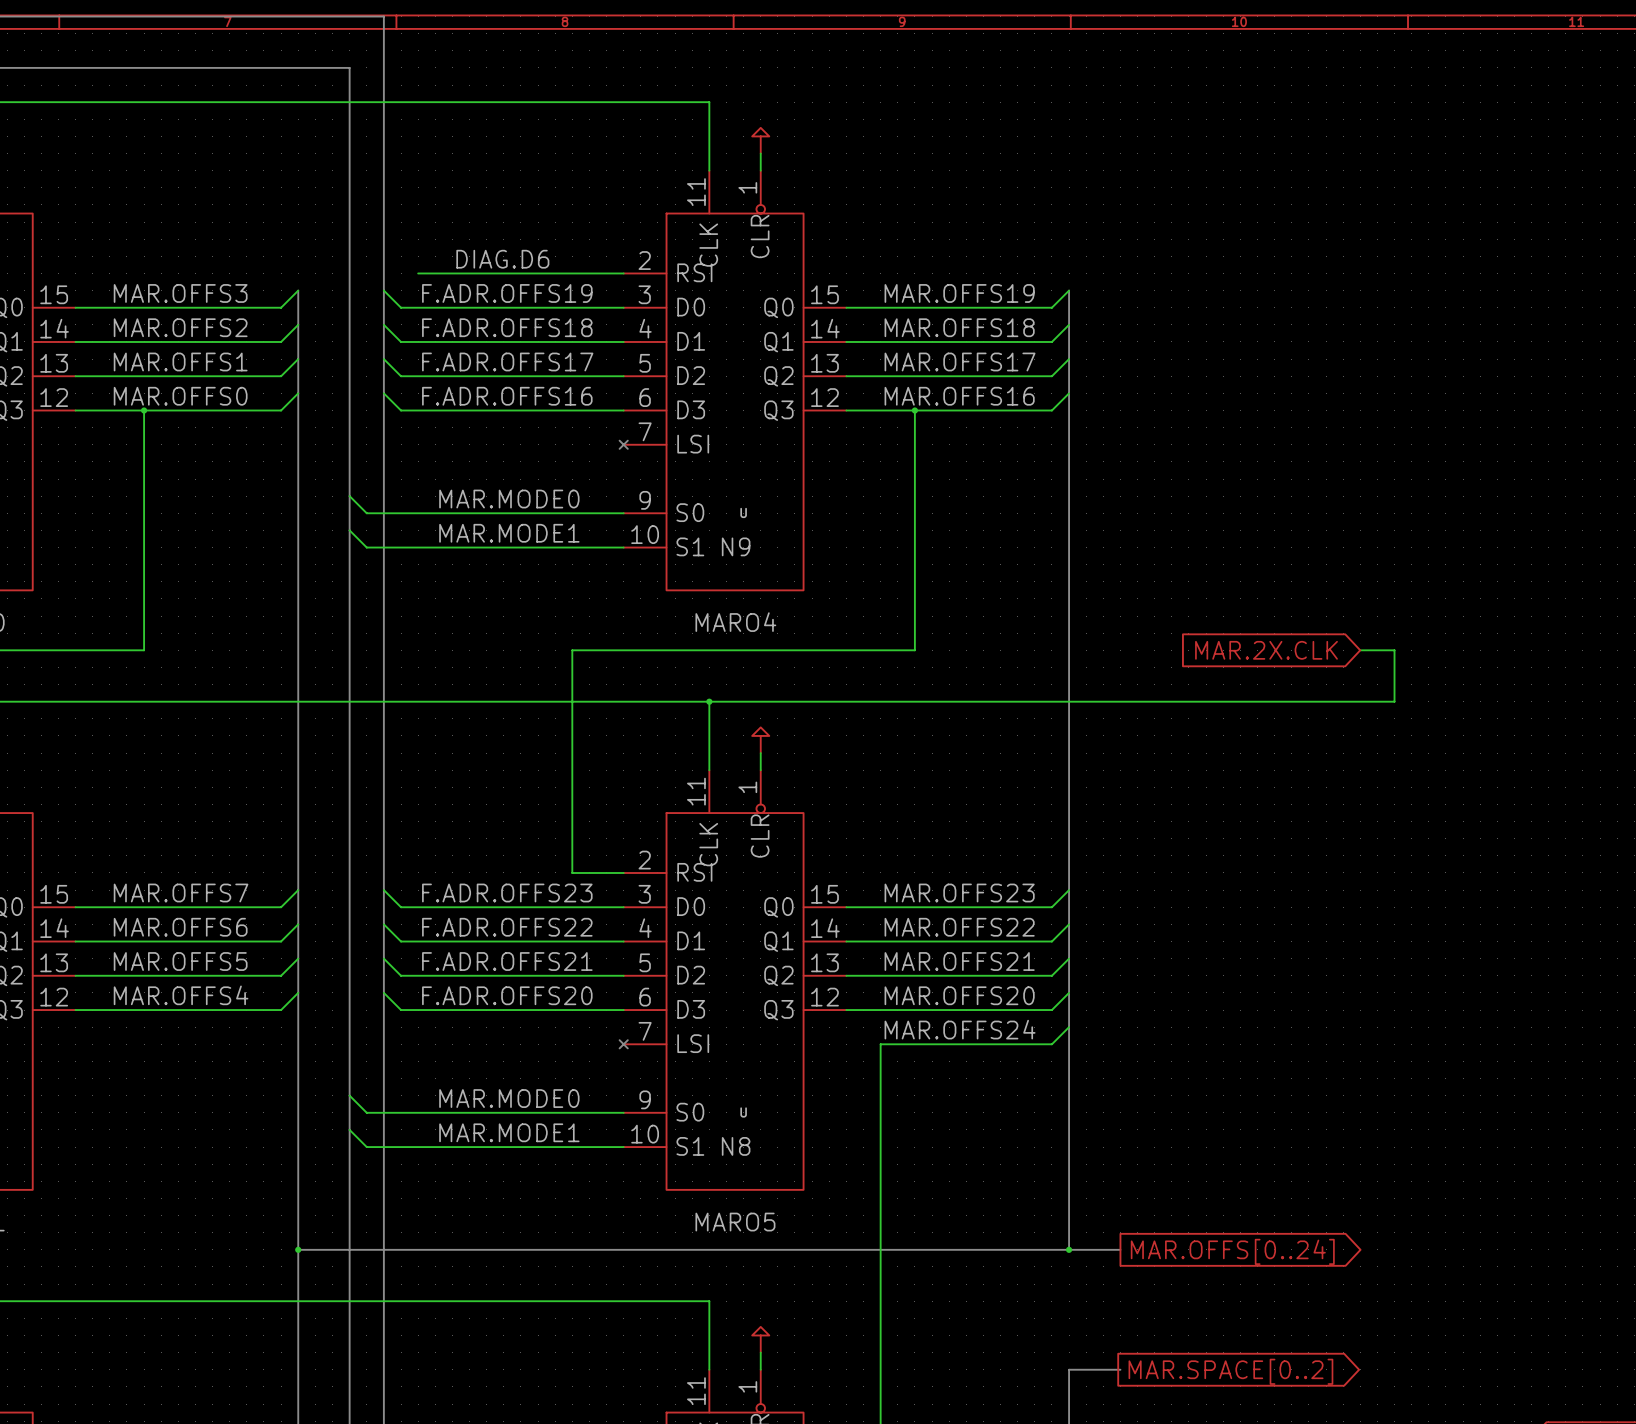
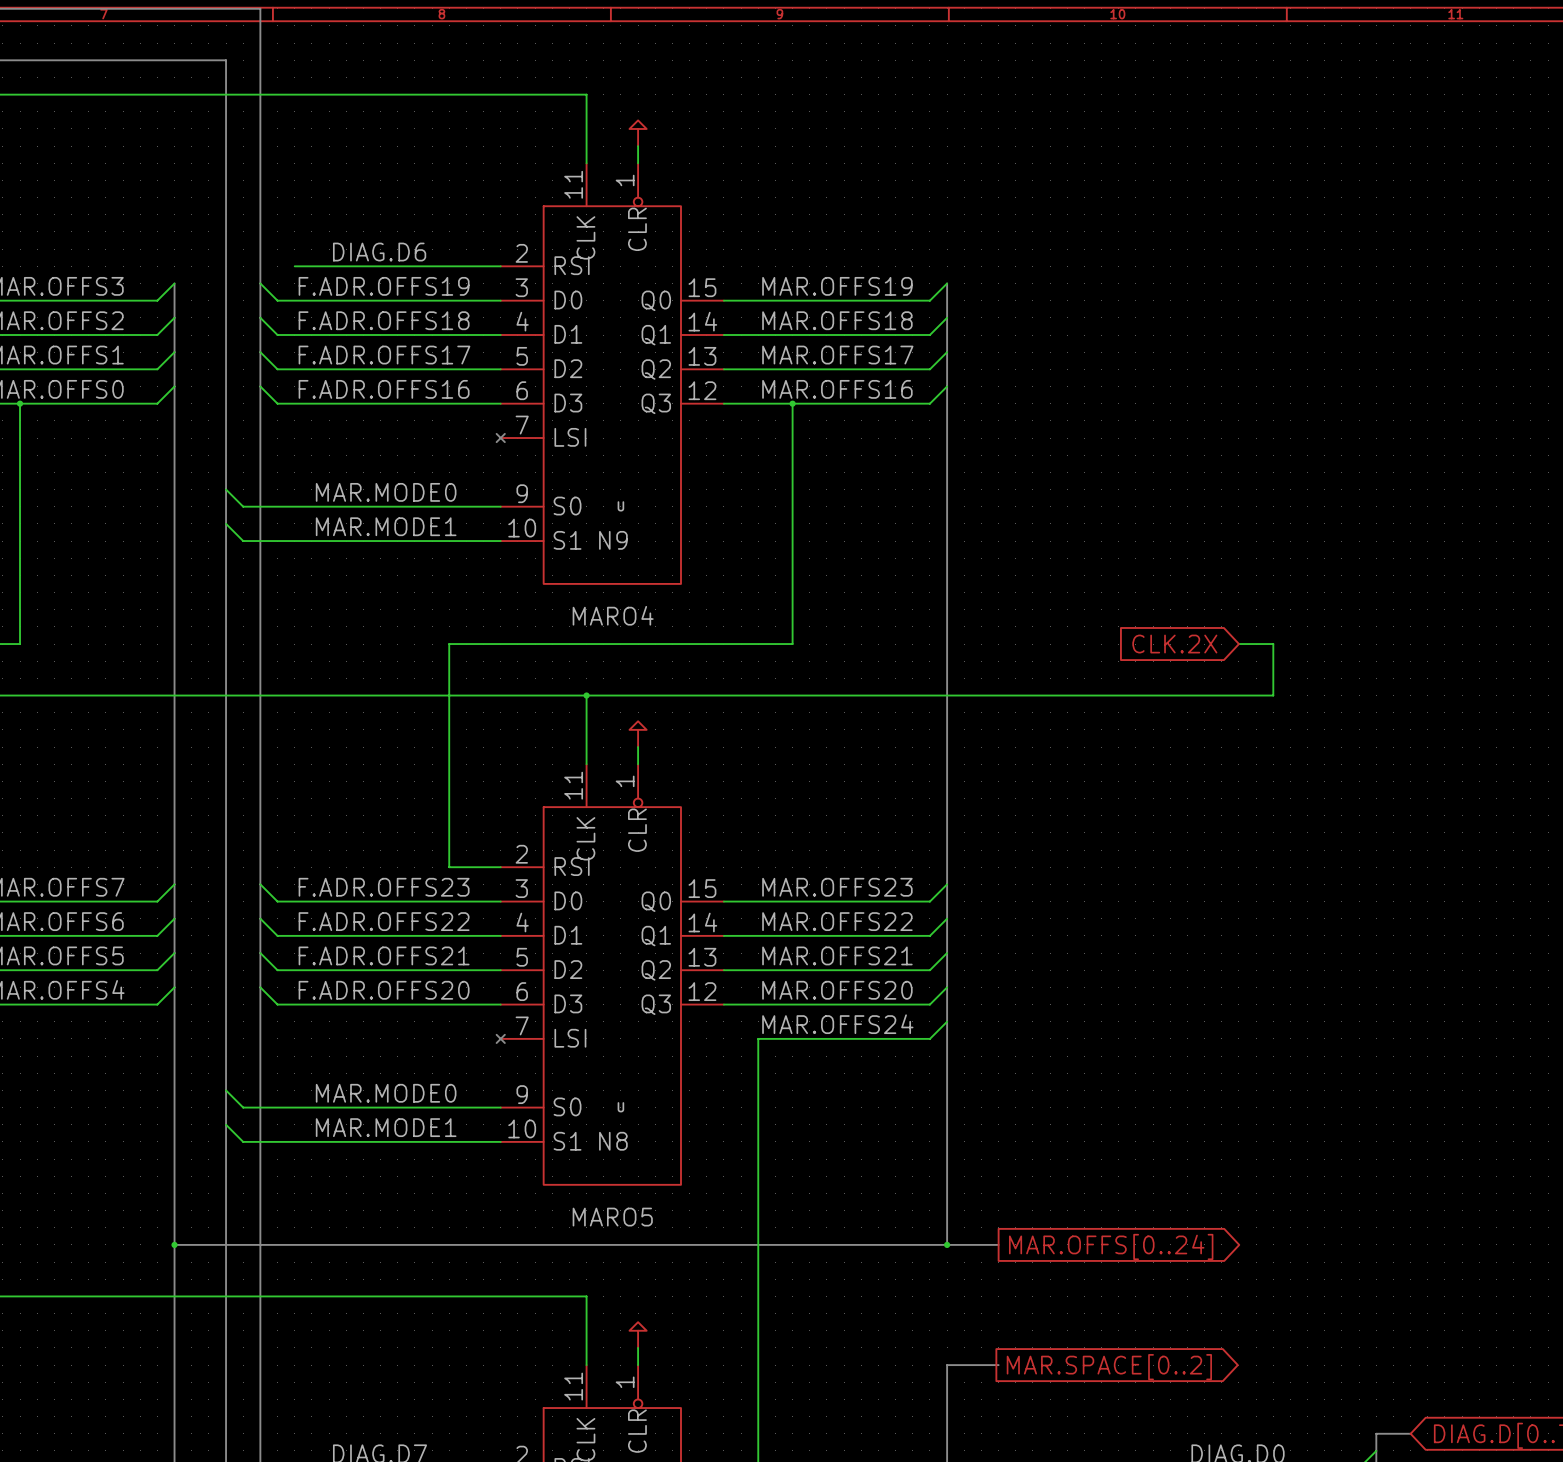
global label: MAR.2X.CLK (1266, 650) -> CLK.2X (1174, 644)

